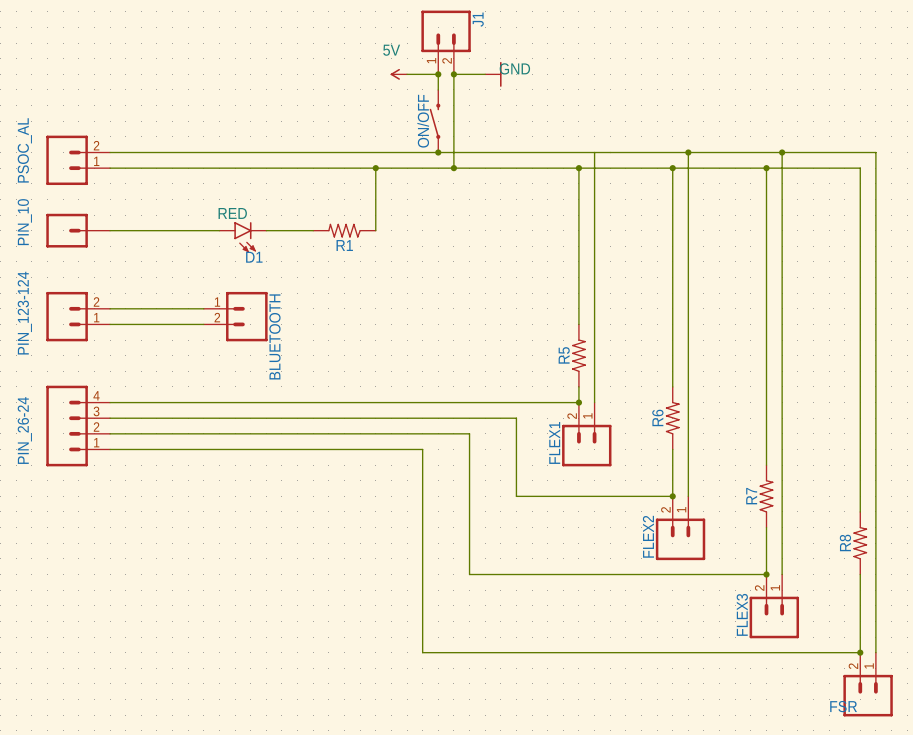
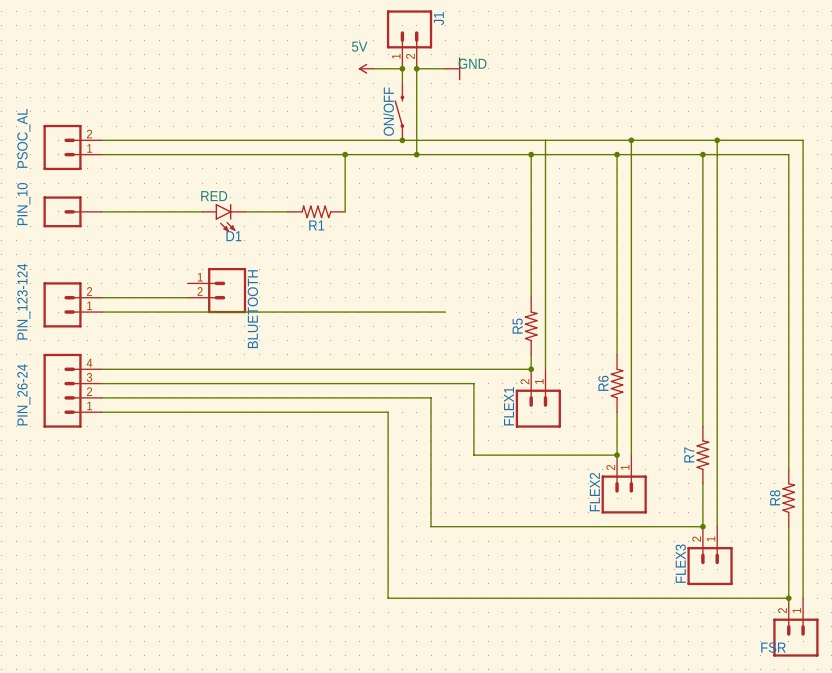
wire: (110, 308) (203, 308) -> none
PIN_123-124 position: (78, 316) -> (72, 304)
wire: none -> (101, 312) (445, 312)

